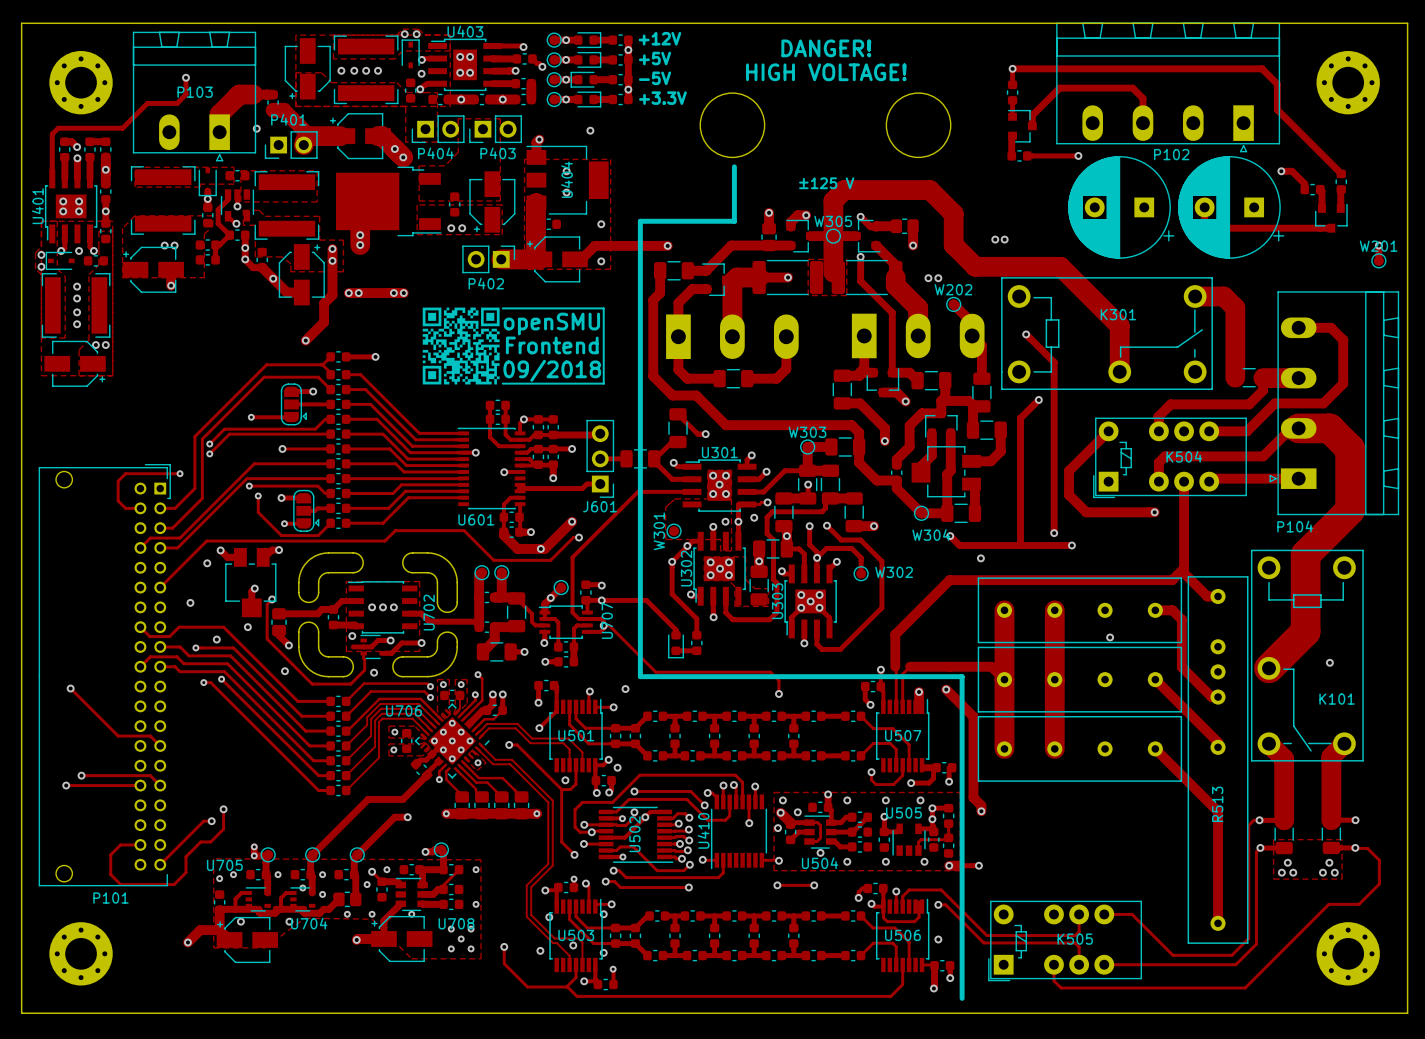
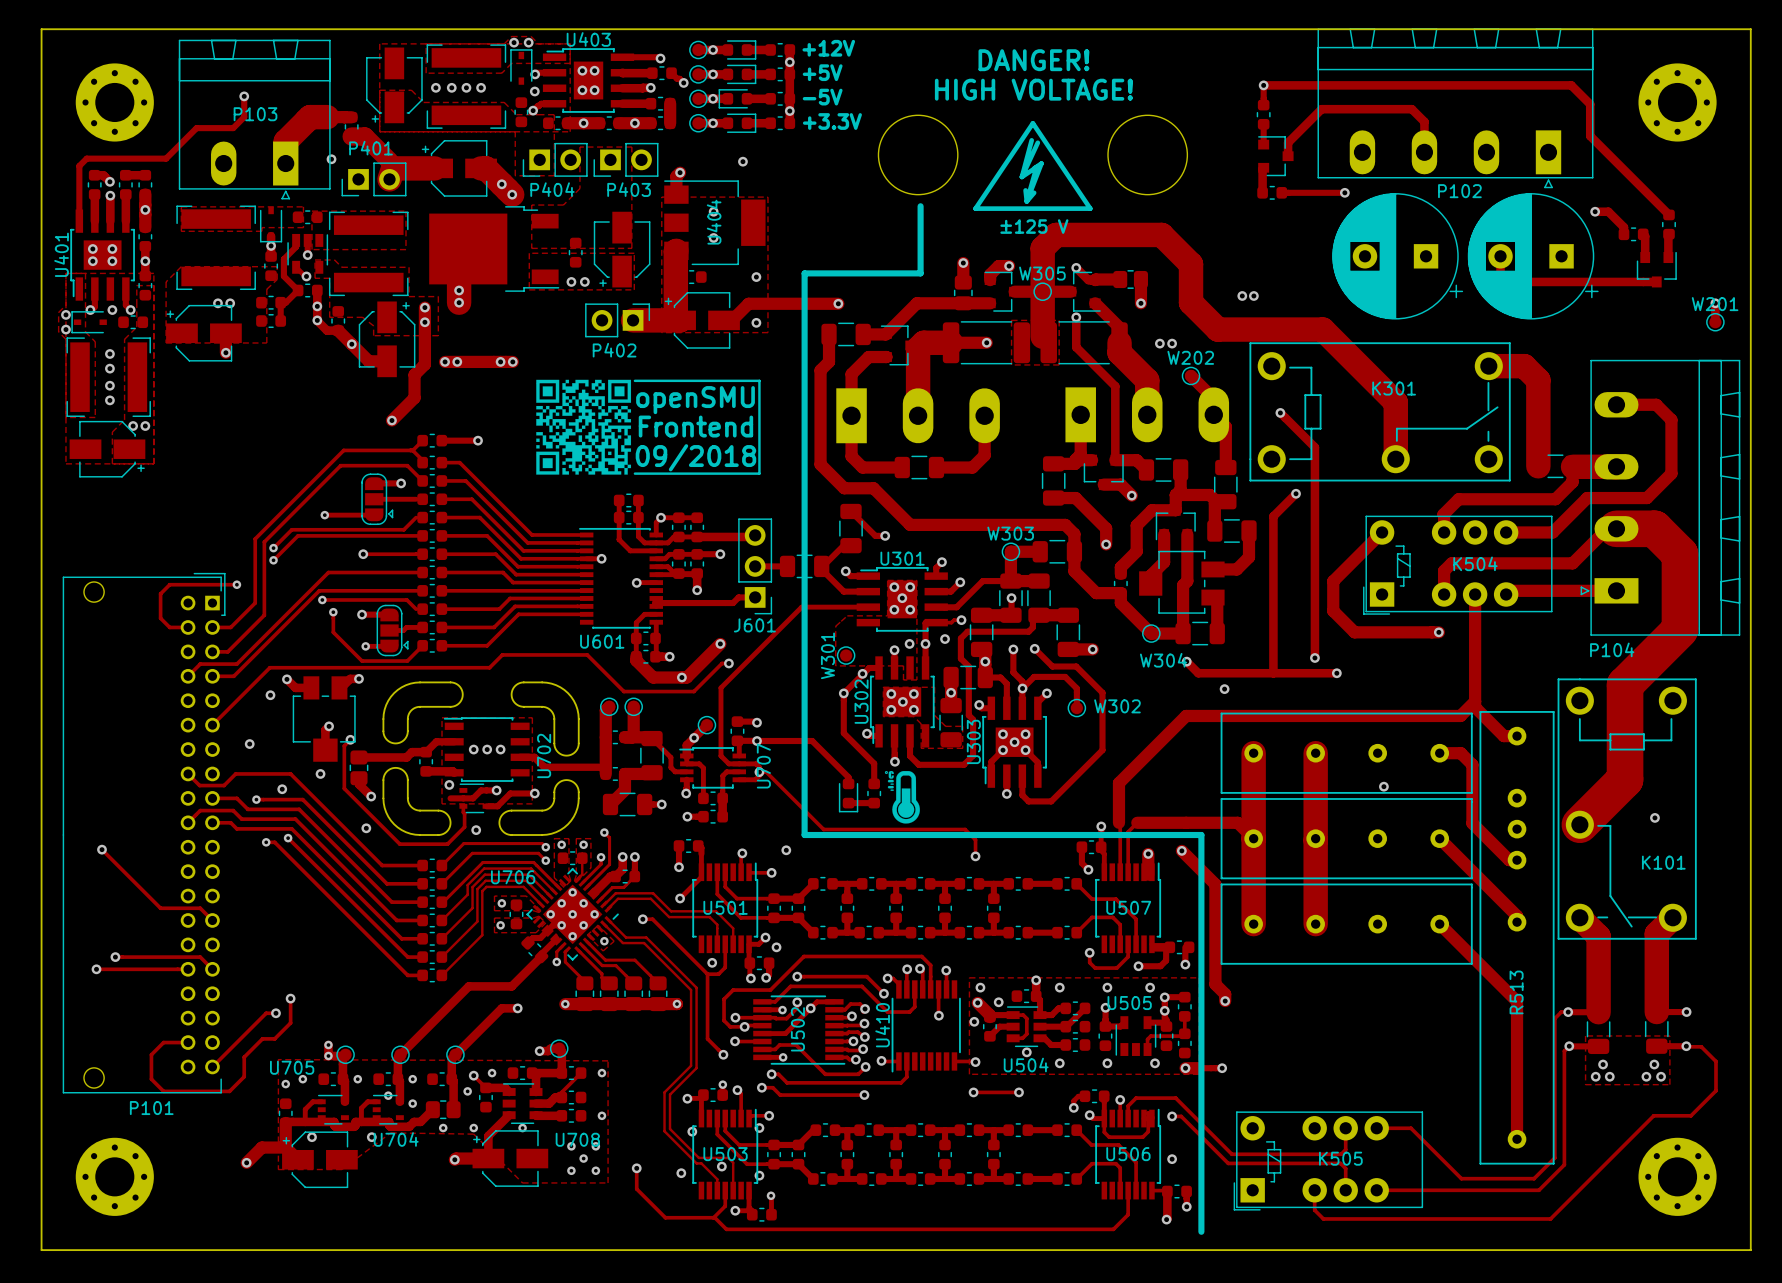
drawing: none -> [973, 121, 1093, 211]
drawing: none -> [884, 770, 920, 824]

